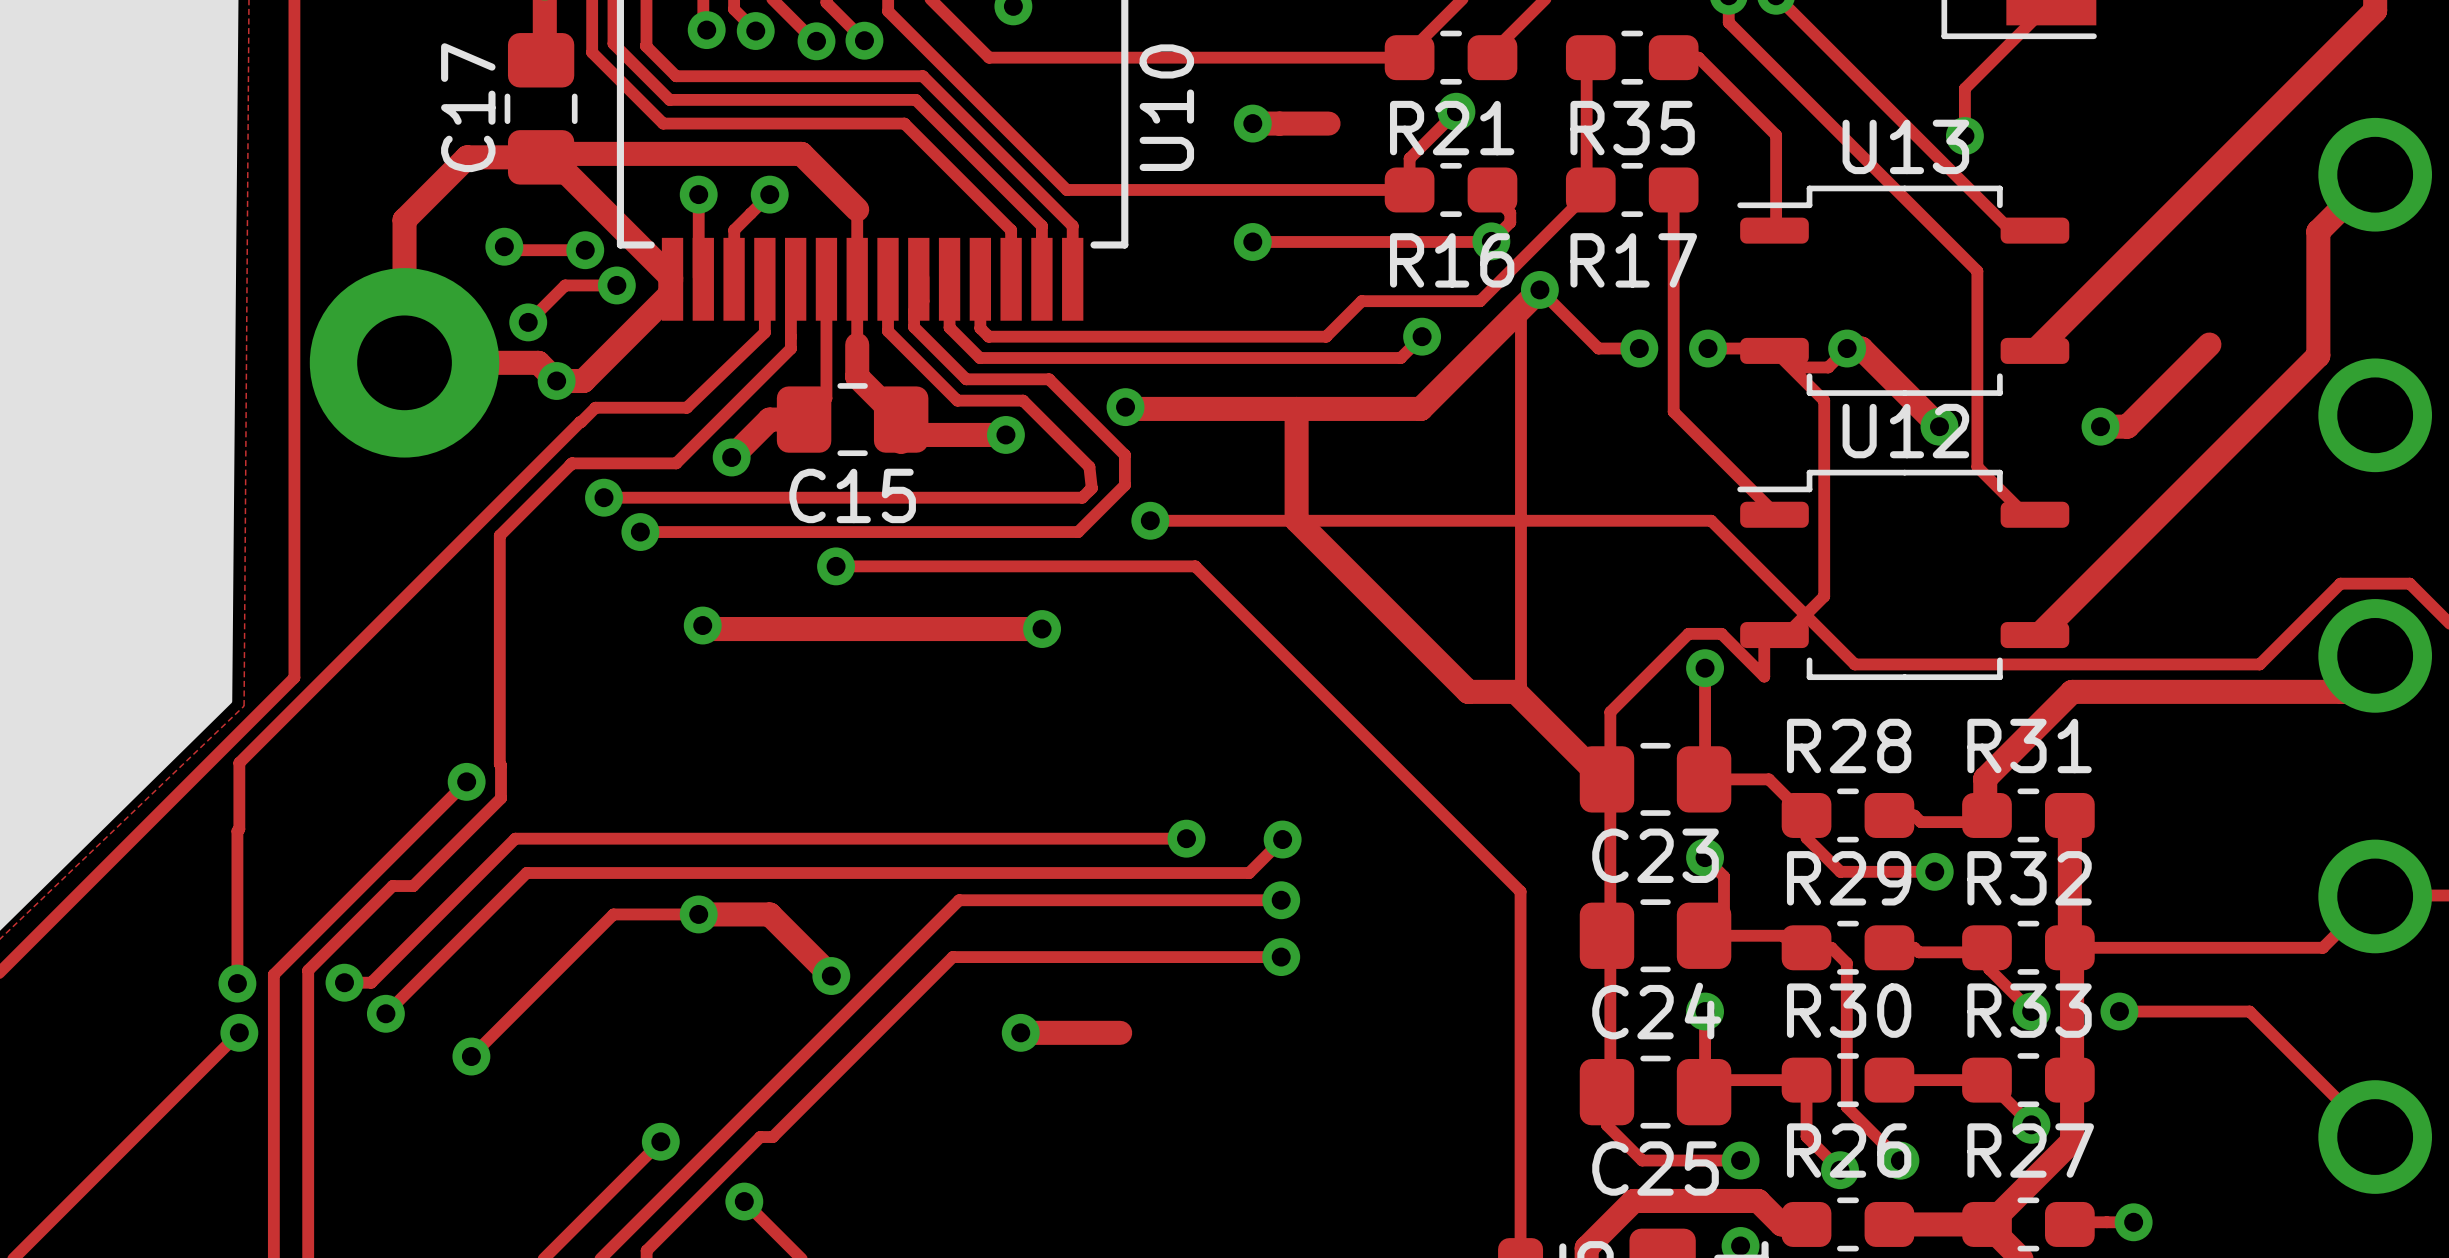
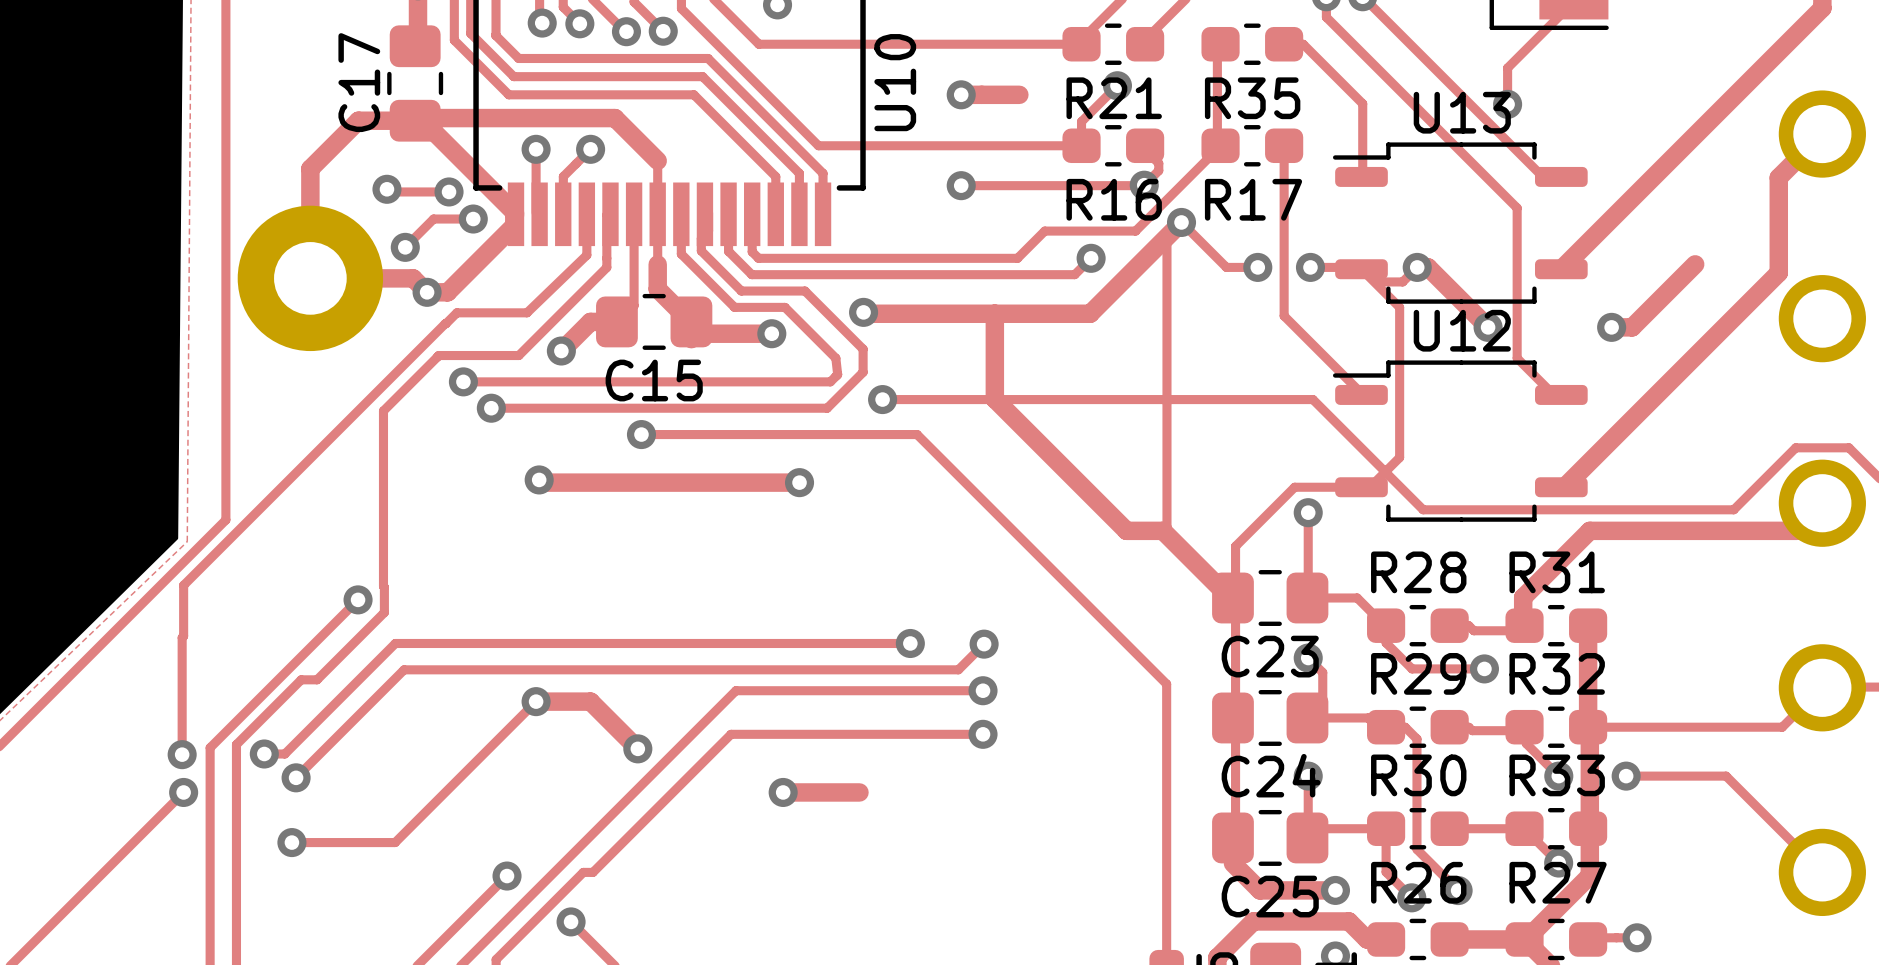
track: (1764, 632) (1764, 676) (1721, 633) (1687, 635) -> (1361, 487) (1294, 487)
track: (698, 914) (613, 914) (471, 1056) -> (536, 701) (395, 842) (291, 842)
via position: (471, 1056) -> (291, 842)
track width: thin (1606, 1125) (1642, 1160) (1740, 1160) -> thick (1232, 863) (1260, 890) (1335, 890)

